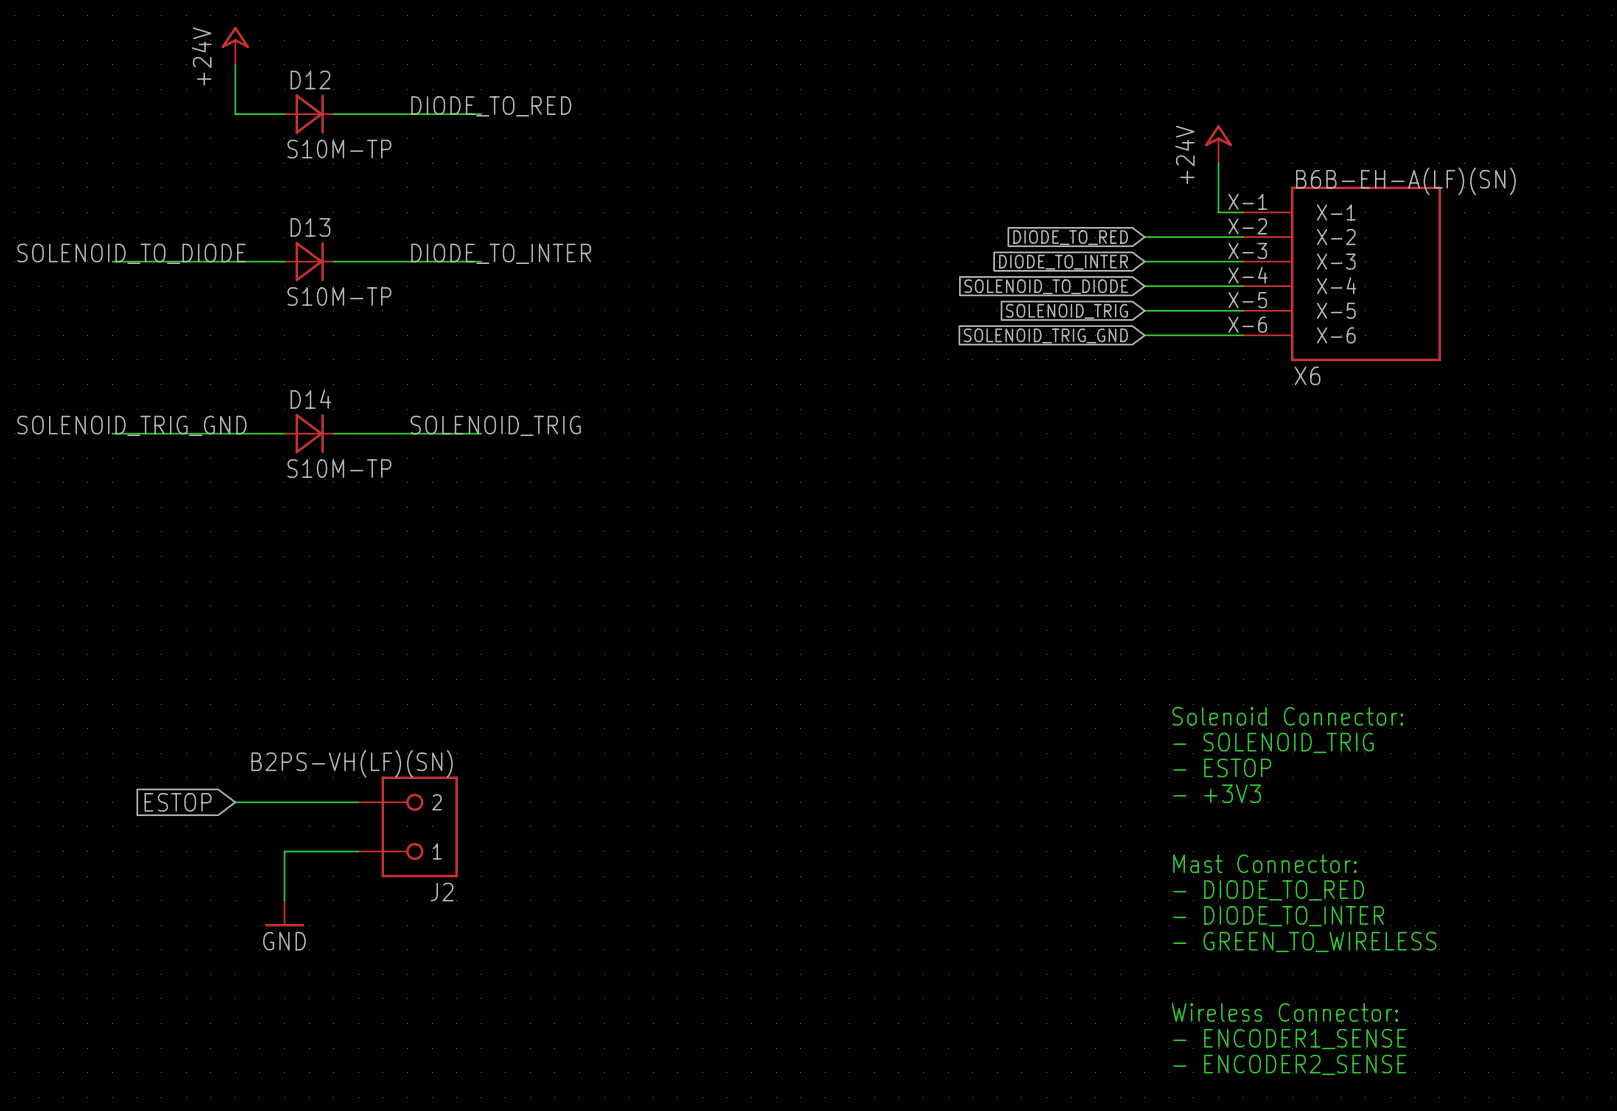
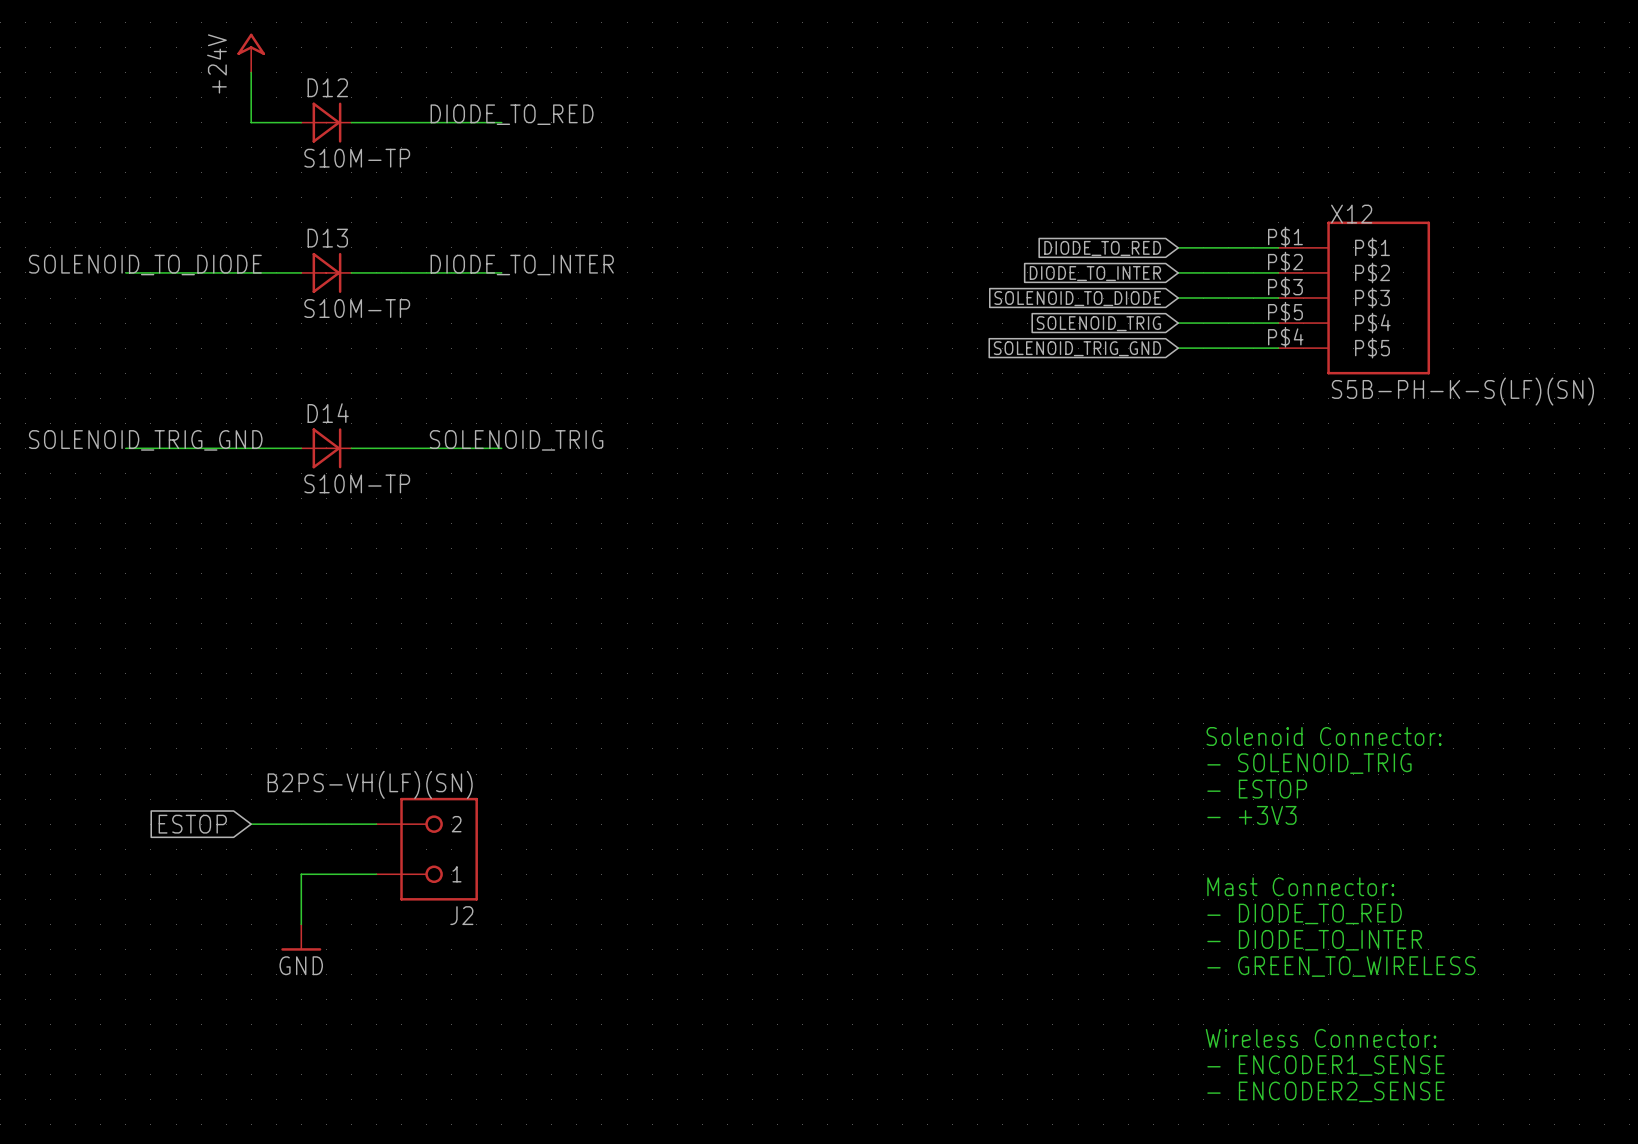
power symbol: +24V (1218, 144) -> none
wire: (1218, 163) (1218, 212) (1243, 212) -> none
X6: B6B-EH-A(LF)(SN) (1342, 273) -> none
X12: none -> S5B-PH-K-S(LF)(SN) (1354, 298)

